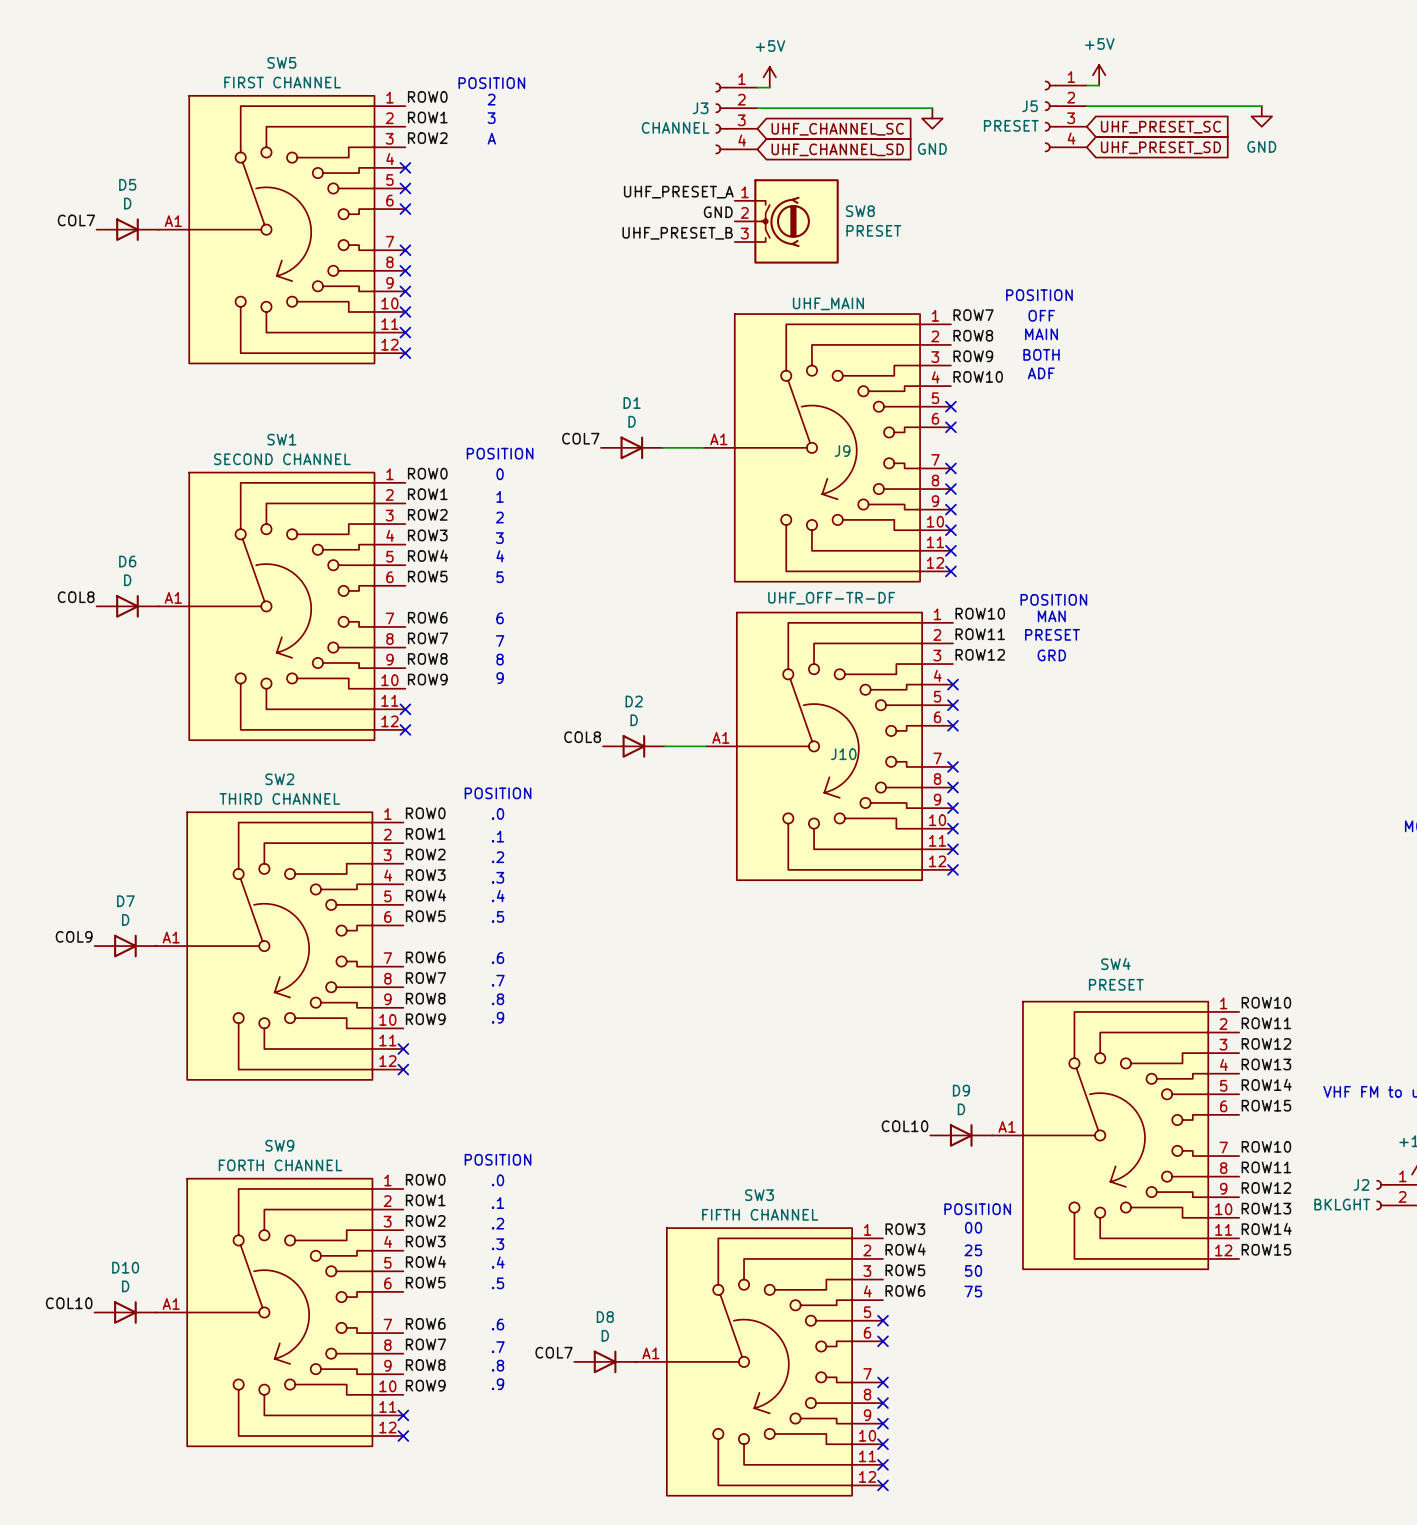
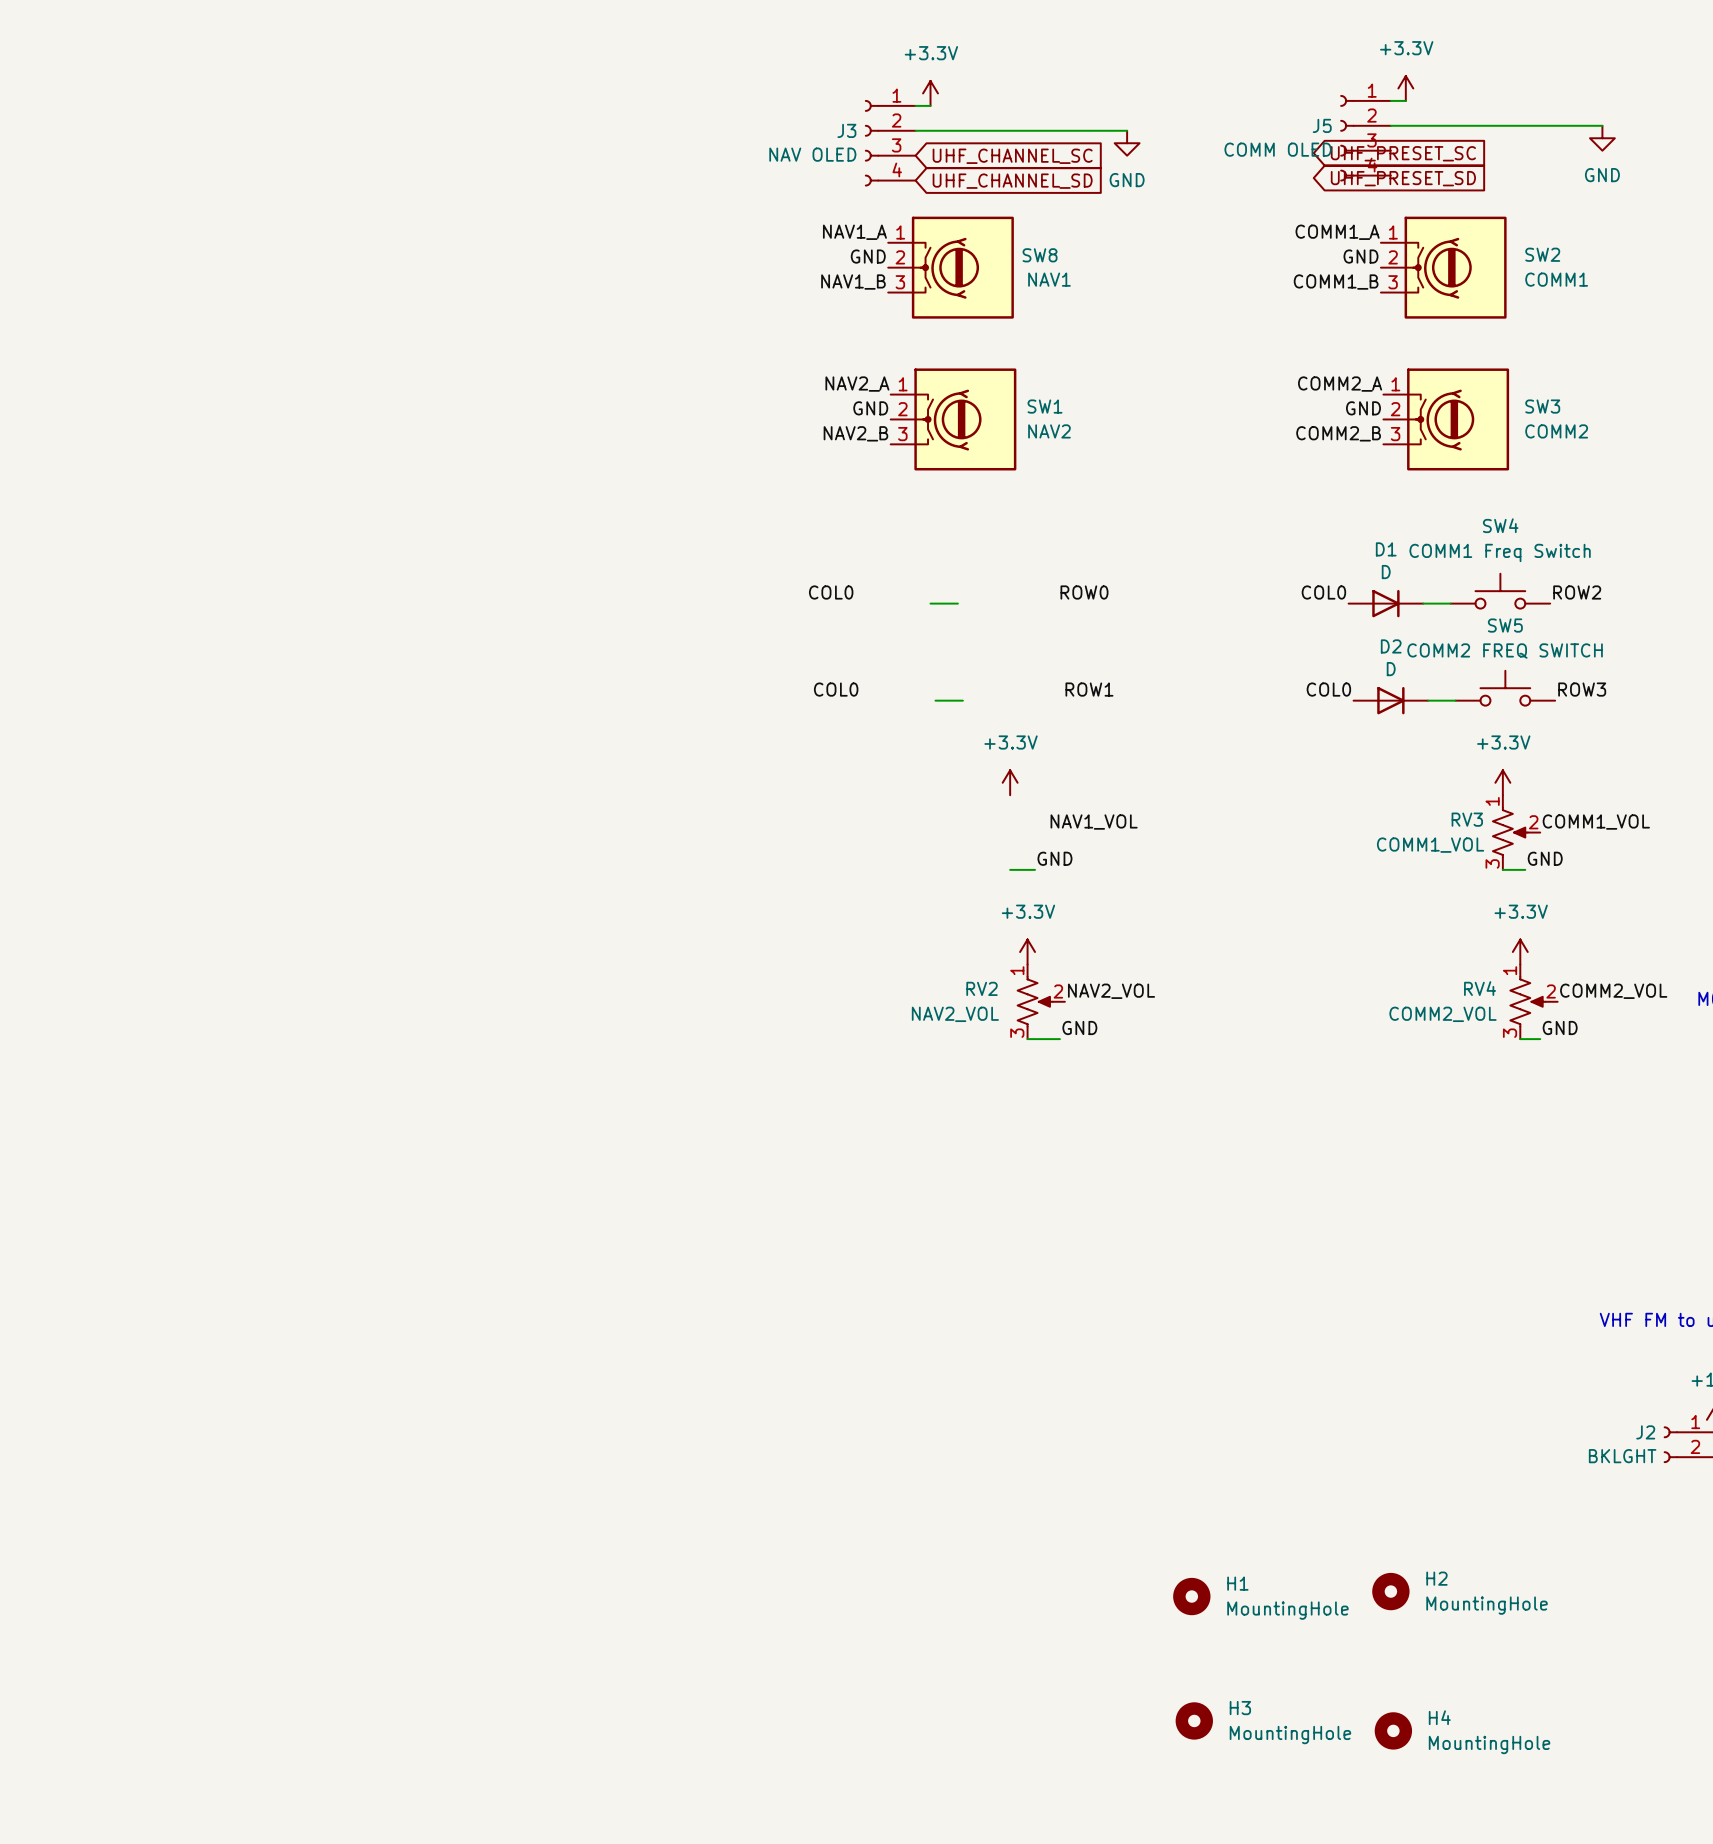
SW5 name position: SW5 (281, 62) -> SW5 (1505, 625)
power symbol: none -> +3.3V (1405, 88)
power symbol: +5V (1099, 75) -> none
power symbol: +5V (769, 77) -> +3.3V (930, 93)
SW5 value: FIRST CHANNEL (282, 82) -> COMM2 FREQ SWITCH (1505, 651)
text: POSITION (491, 83) -> none
wire: (1086, 85) (1099, 85) -> (1390, 100) (1405, 100)
SW5 symbol: [158, 95, 406, 364] -> [1455, 670, 1556, 706]
label: ROW0 (427, 96) -> none
text: 2 (491, 99) -> none
wire: (1086, 106) (1261, 106) -> (1390, 125) (1602, 125)
J5 position: (1065, 116) -> (1365, 138)
power symbol position: GND (1261, 116) -> GND (1602, 138)
label: ROW1 (427, 117) -> none
text: 3 (491, 118) -> none
J5 value: PRESET (1011, 125) -> COMM OLED (1278, 149)
J3 value: CHANNEL (675, 127) -> NAV OLED (812, 154)
label: ROW2 (427, 138) -> none
text: A (491, 138) -> none
no-connect mark: (405, 167) -> none
no-connect mark: (405, 188) -> none
label: UHF_PRESET_A (678, 192) -> NAV1_A (854, 232)
label: none -> COMM1_A (1337, 232)
no-connect mark: (405, 209) -> none
label: none -> GND (1361, 256)
label: COL7 (76, 220) -> none
D5: D (127, 229) -> none
SW8 value: PRESET (873, 230) -> NAV1 (1049, 279)
label: UHF_PRESET_B (677, 233) -> NAV1_B (853, 282)
label: none -> COMM1_B (1336, 282)
no-connect mark: (405, 250) -> none
no-connect mark: (405, 270) -> none
no-connect mark: (405, 291) -> none
text: POSITION (1039, 295) -> none
no-connect mark: (405, 312) -> none
label: ROW7 (973, 315) -> none
text: OFF (1041, 315) -> none
label: none -> NAV2_A (857, 384)
label: none -> COMM2_A (1340, 384)
no-connect mark: (405, 332) -> none
text: MAIN (1041, 334) -> none
label: ROW8 (973, 335) -> none
label: none -> GND (870, 408)
label: none -> GND (1363, 408)
no-connect mark: (405, 353) -> none
text: BOTH (1041, 354) -> none
label: ROW9 (973, 356) -> none
label: none -> NAV2_B (855, 433)
label: none -> COMM2_B (1338, 433)
text: ADF (1041, 373) -> none
label: ROW10 (978, 376) -> none
no-connect mark: (950, 406) -> none
no-connect mark: (950, 427) -> none
label: COL7 (580, 438) -> none
SW1 name position: SW1 (281, 439) -> SW1 (1045, 406)
D1 position: (631, 447) -> (1385, 603)
wire: (662, 447) (703, 447) -> none
J9: UHF_MAIN (827, 447) -> none
text: POSITION (500, 453) -> none
SW1 value: SECOND CHANNEL (282, 459) -> NAV2 (1049, 431)
no-connect mark: (950, 468) -> none
SW1 symbol: [158, 472, 406, 741] -> [890, 368, 1017, 471]
label: ROW0 (427, 473) -> none
text: 0 (500, 474) -> none
no-connect mark: (950, 489) -> none
label: none -> COL0 (831, 592)
label: none -> ROW0 (1084, 592)
label: none -> COL0 (1323, 592)
label: none -> ROW2 (1577, 592)
label: ROW1 (427, 494) -> none
text: 1 (500, 496) -> none
wire: none -> (1423, 603) (1450, 603)
no-connect mark: (950, 509) -> none
label: ROW2 (427, 514) -> none
text: 2 (499, 517) -> none
no-connect mark: (950, 530) -> none
label: ROW3 (427, 535) -> none
text: 3 (499, 538) -> none
no-connect mark: (950, 550) -> none
label: ROW4 (428, 555) -> none
text: 4 (500, 556) -> none
label: none -> COL0 (836, 689)
label: none -> ROW1 (1089, 689)
label: none -> COL0 (1328, 689)
label: none -> ROW3 (1582, 689)
no-connect mark: (950, 571) -> none
label: ROW5 (427, 576) -> none
text: 5 (500, 577) -> none
wire: none -> (1428, 700) (1455, 700)
label: COL8 (76, 597) -> none
text: POSITION (1053, 599) -> none
D6: D (127, 606) -> none
label: ROW10 (980, 613) -> none
text: MAN (1051, 616) -> none
label: ROW6 (427, 617) -> none
text: 6 (500, 618) -> none
label: ROW11 (980, 634) -> none
text: PRESET (1052, 634) -> none
label: ROW7 (428, 638) -> none
text: 7 (500, 641) -> none
power symbol: none -> +3.3V (1010, 782)
power symbol: none -> +3.3V (1502, 782)
label: ROW12 (980, 654) -> none
text: GRD (1051, 655) -> none
label: ROW8 (427, 658) -> none
text: 8 (500, 659) -> none
text: 9 (500, 678) -> none
label: ROW9 (427, 679) -> none
label: none -> NAV1_VOL (1094, 822)
label: none -> COMM1_VOL (1596, 822)
no-connect mark: (952, 684) -> none
RV3: none -> COMM1_VOL (1516, 832)
no-connect mark: (952, 705) -> none
no-connect mark: (405, 709) -> none
label: none -> GND (1054, 858)
label: none -> GND (1545, 858)
wire: none -> (1502, 869) (1525, 869)
no-connect mark: (952, 725) -> none
no-connect mark: (405, 729) -> none
label: COL8 (582, 737) -> none
D2 position: (633, 746) -> (1390, 700)
wire: (664, 746) (705, 746) -> none
J10: UHF_OFF-TR-DF (829, 746) -> none
no-connect mark: (952, 766) -> none
SW2 name position: SW2 (279, 779) -> SW2 (1542, 254)
power symbol: none -> +3.3V (1027, 952)
no-connect mark: (952, 787) -> none
power symbol: none -> +3.3V (1520, 952)
text: POSITION (498, 793) -> none
SW2 value: THIRD CHANNEL (279, 798) -> COMM1 (1556, 279)
no-connect mark: (952, 808) -> none
SW2 symbol: [156, 812, 404, 1080] -> [1380, 216, 1507, 319]
label: ROW0 (425, 813) -> none
text: .0 (498, 813) -> none
label: none -> NAV2_VOL (1111, 991)
label: none -> COMM2_VOL (1613, 991)
RV2: none -> NAV2_VOL (1041, 1001)
no-connect mark: (952, 828) -> none
RV4: none -> COMM2_VOL (1533, 1001)
label: ROW1 (425, 833) -> none
text: .1 (498, 836) -> none
no-connect mark: (952, 849) -> none
label: none -> GND (1079, 1028)
label: none -> GND (1560, 1028)
label: ROW2 (425, 854) -> none
text: .2 (498, 857) -> none
wire: none -> (1520, 1039) (1540, 1039)
no-connect mark: (952, 869) -> none
label: ROW3 (425, 875) -> none
text: .3 (498, 877) -> none
label: ROW4 (425, 895) -> none
text: .4 (498, 896) -> none
label: ROW5 (425, 916) -> none
text: .5 (498, 916) -> none
label: COL9 (74, 936) -> none
D7: D (125, 946) -> none
label: ROW6 (425, 957) -> none
text: .6 (498, 958) -> none
SW4 name position: SW4 (1115, 963) -> SW4 (1500, 525)
label: ROW7 (425, 978) -> none
text: .7 (498, 980) -> none
SW4 value: PRESET (1116, 984) -> COMM1 Freq Switch (1500, 552)
label: ROW8 (425, 998) -> none
text: .8 (498, 999) -> none
SW4 symbol: [992, 1001, 1240, 1270] -> [1450, 573, 1551, 609]
label: ROW10 (1266, 1002) -> none
text: .9 (498, 1017) -> none
label: ROW9 (425, 1019) -> none
label: ROW11 (1266, 1023) -> none
label: ROW12 (1266, 1043) -> none
no-connect mark: (403, 1048) -> none
label: ROW13 (1266, 1064) -> none
no-connect mark: (403, 1069) -> none
label: ROW14 (1266, 1084) -> none
label: ROW15 (1266, 1105) -> none
label: COL10 (905, 1126) -> none
D9: D (961, 1135) -> none
label: ROW10 (1266, 1146) -> none
text: POSITION (498, 1159) -> none
label: ROW11 (1266, 1167) -> none
label: ROW0 (425, 1179) -> none
text: .0 (498, 1180) -> none
label: ROW12 (1266, 1188) -> none
SW3 name position: SW3 (759, 1195) -> SW3 (1542, 406)
label: ROW1 (425, 1200) -> none
text: .1 (498, 1203) -> none
label: ROW13 (1266, 1208) -> none
text: POSITION (977, 1209) -> none
SW3 value: FIFTH CHANNEL (760, 1214) -> COMM2 (1556, 431)
label: ROW2 (425, 1220) -> none
text: .2 (498, 1223) -> none
text: 00 (973, 1227) -> none
SW3 symbol: [635, 1228, 883, 1496] -> [1383, 368, 1510, 471]
label: ROW14 (1266, 1228) -> none
label: ROW3 (905, 1229) -> none
label: ROW3 (425, 1241) -> none
text: .3 (498, 1244) -> none
label: ROW4 (905, 1249) -> none
label: ROW15 (1266, 1249) -> none
text: 25 (973, 1250) -> none
label: ROW4 (425, 1261) -> none
text: .4 (498, 1262) -> none
label: ROW5 (905, 1270) -> none
text: 50 (973, 1270) -> none
label: ROW5 (425, 1282) -> none
text: .5 (498, 1283) -> none
label: ROW6 (905, 1290) -> none
text: 75 (973, 1291) -> none
label: COL10 (69, 1303) -> none
D10: D (125, 1312) -> none
SW9: FORTH CHANNEL (279, 1312) -> none
H2: none -> MountingHole (1390, 1591)
no-connect mark: (882, 1320) -> none
H1: none -> MountingHole (1191, 1596)
label: ROW6 (425, 1323) -> none
text: .6 (498, 1324) -> none
no-connect mark: (882, 1341) -> none
label: ROW7 (425, 1344) -> none
text: .7 (498, 1347) -> none
label: COL7 (554, 1352) -> none
D8: D (605, 1361) -> none
label: ROW8 (425, 1365) -> none
text: .8 (498, 1365) -> none
no-connect mark: (882, 1382) -> none
text: .9 (498, 1384) -> none
label: ROW9 (425, 1385) -> none
no-connect mark: (882, 1403) -> none
no-connect mark: (403, 1415) -> none
no-connect mark: (882, 1423) -> none
H3: none -> MountingHole (1194, 1720)
H4: none -> MountingHole (1393, 1730)
no-connect mark: (403, 1436) -> none
no-connect mark: (882, 1444) -> none
no-connect mark: (882, 1464) -> none
no-connect mark: (882, 1485) -> none

